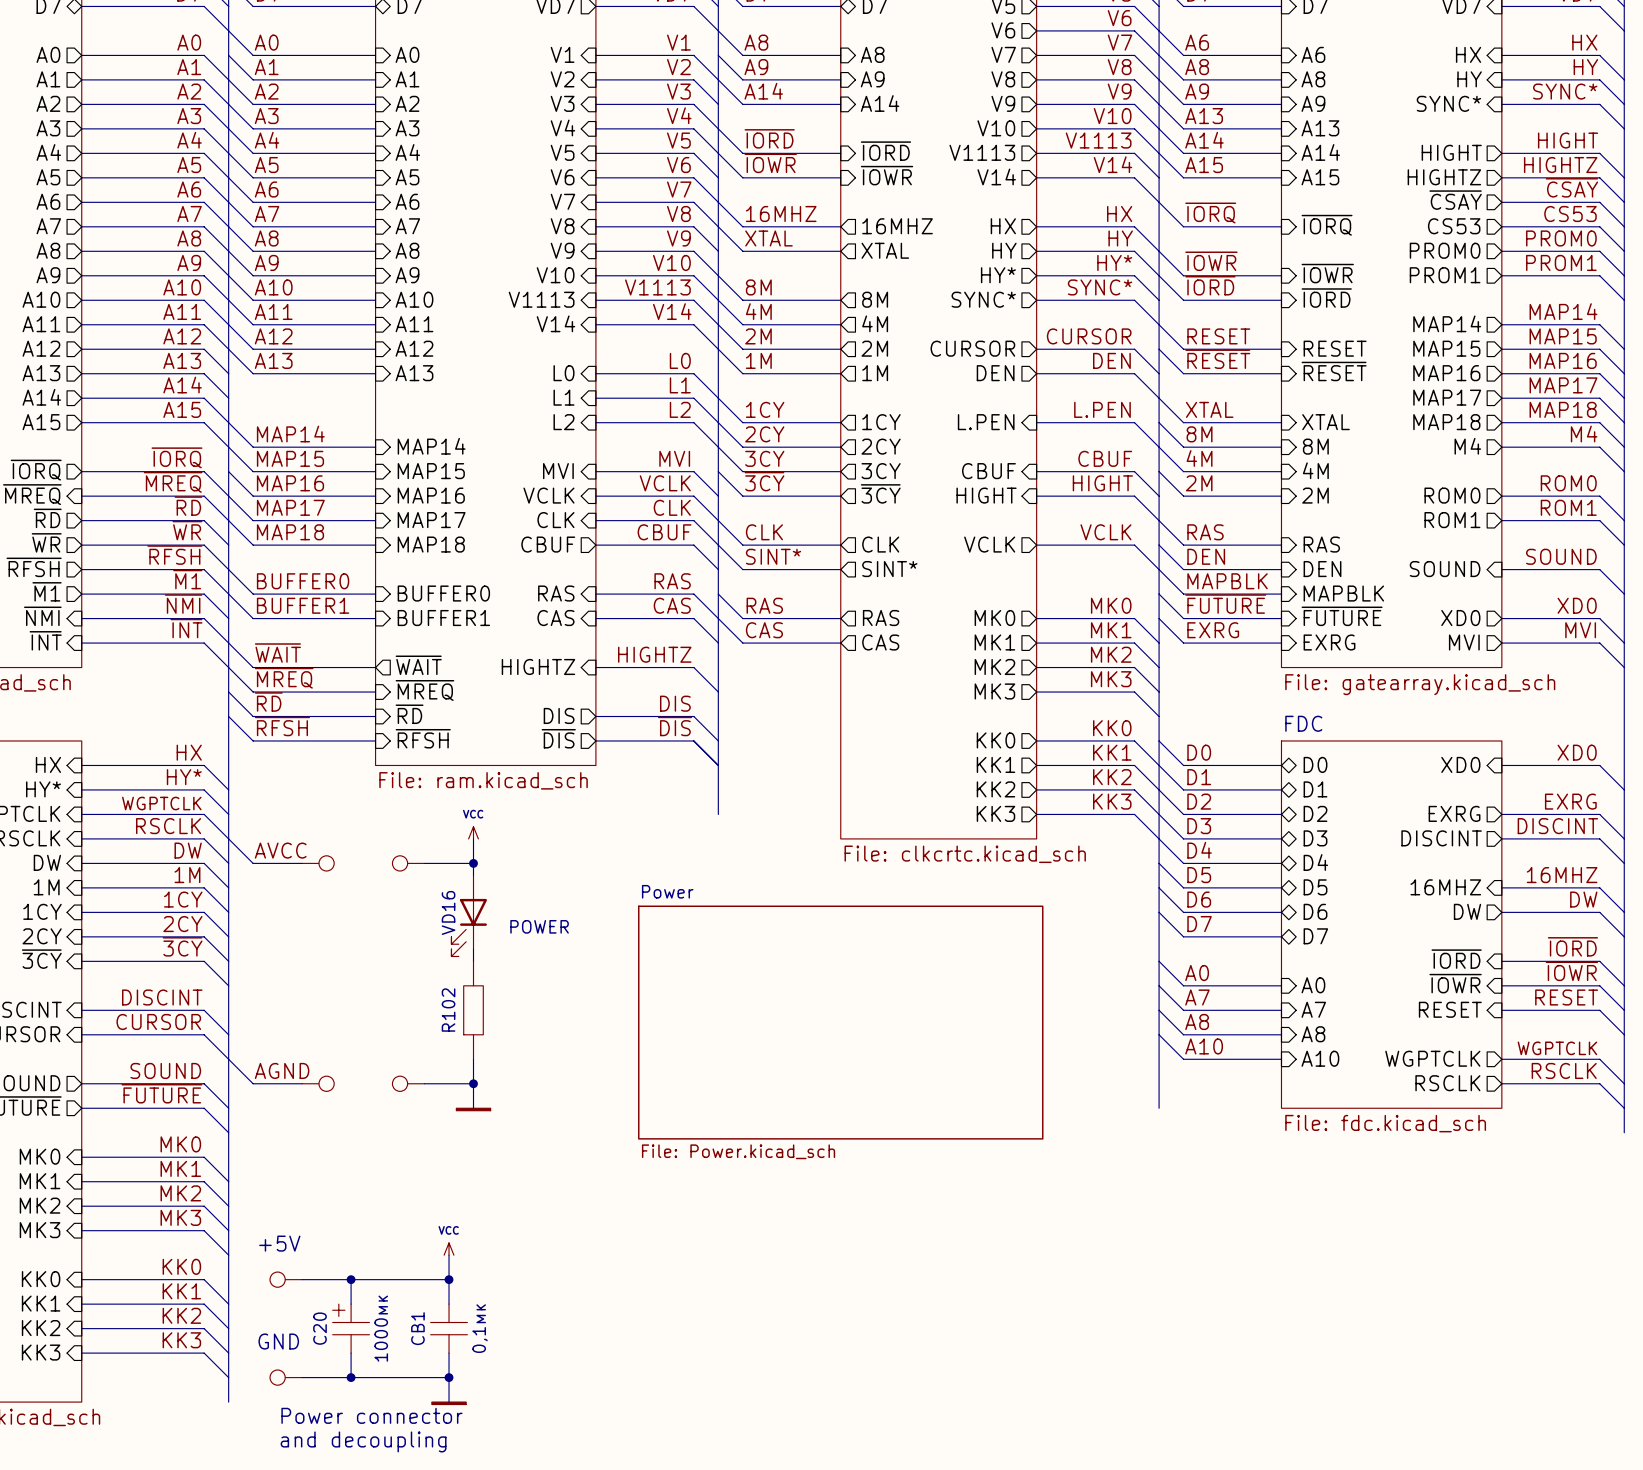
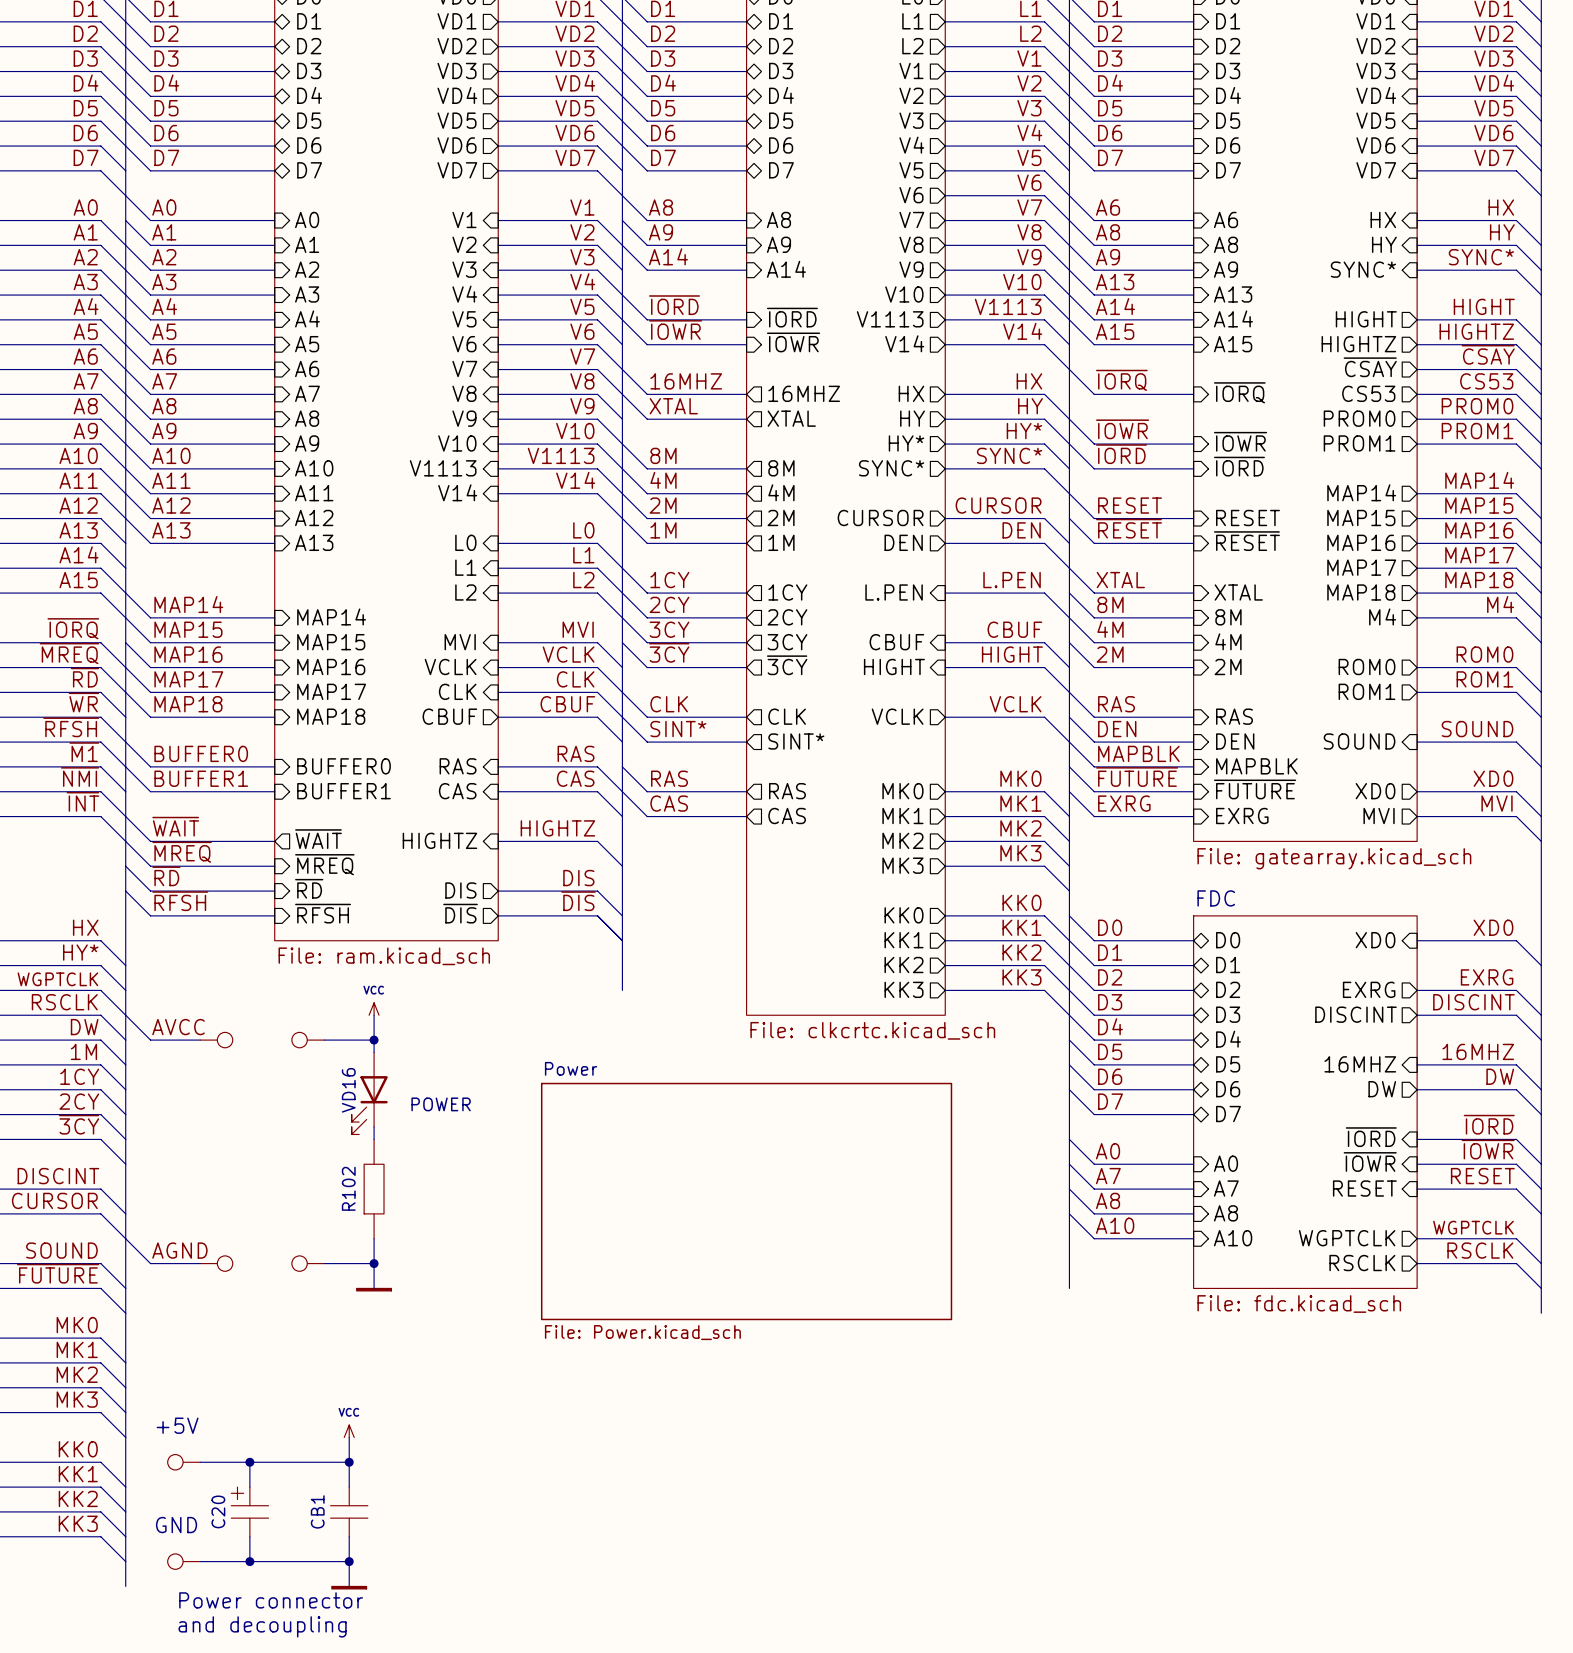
C20 value: 1000мк (381, 1328) -> none
CB1 value: 0,1мк (480, 1328) -> none

